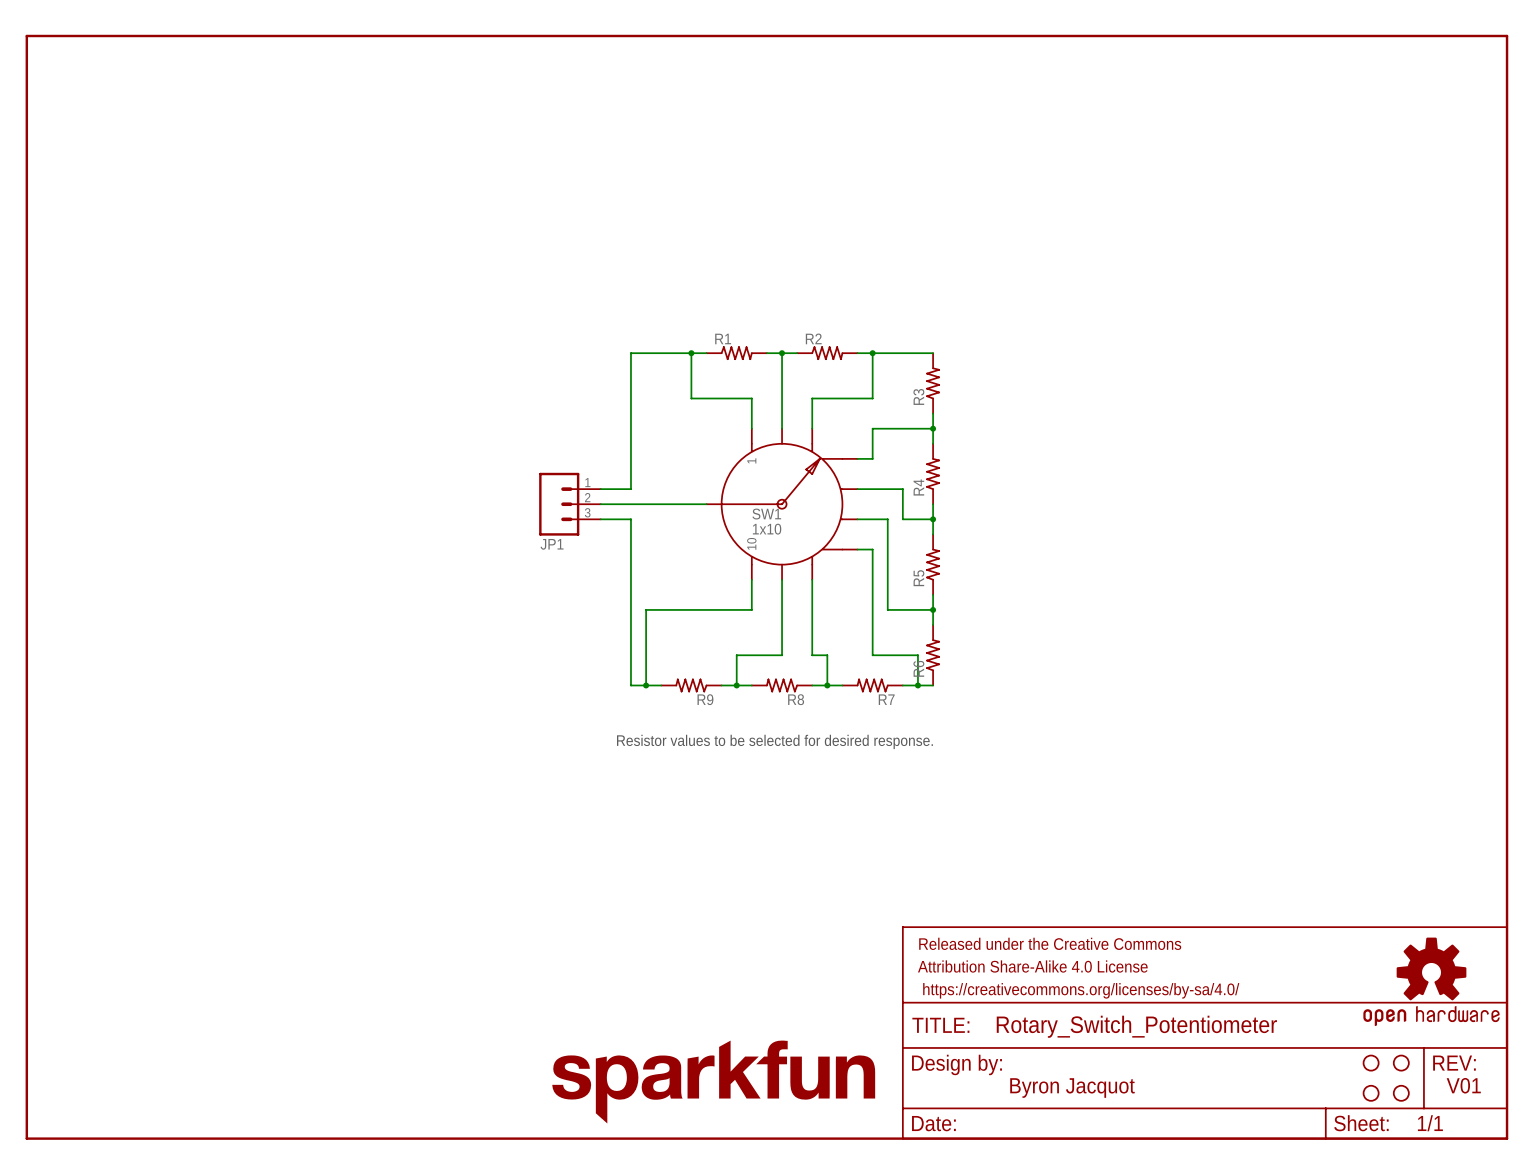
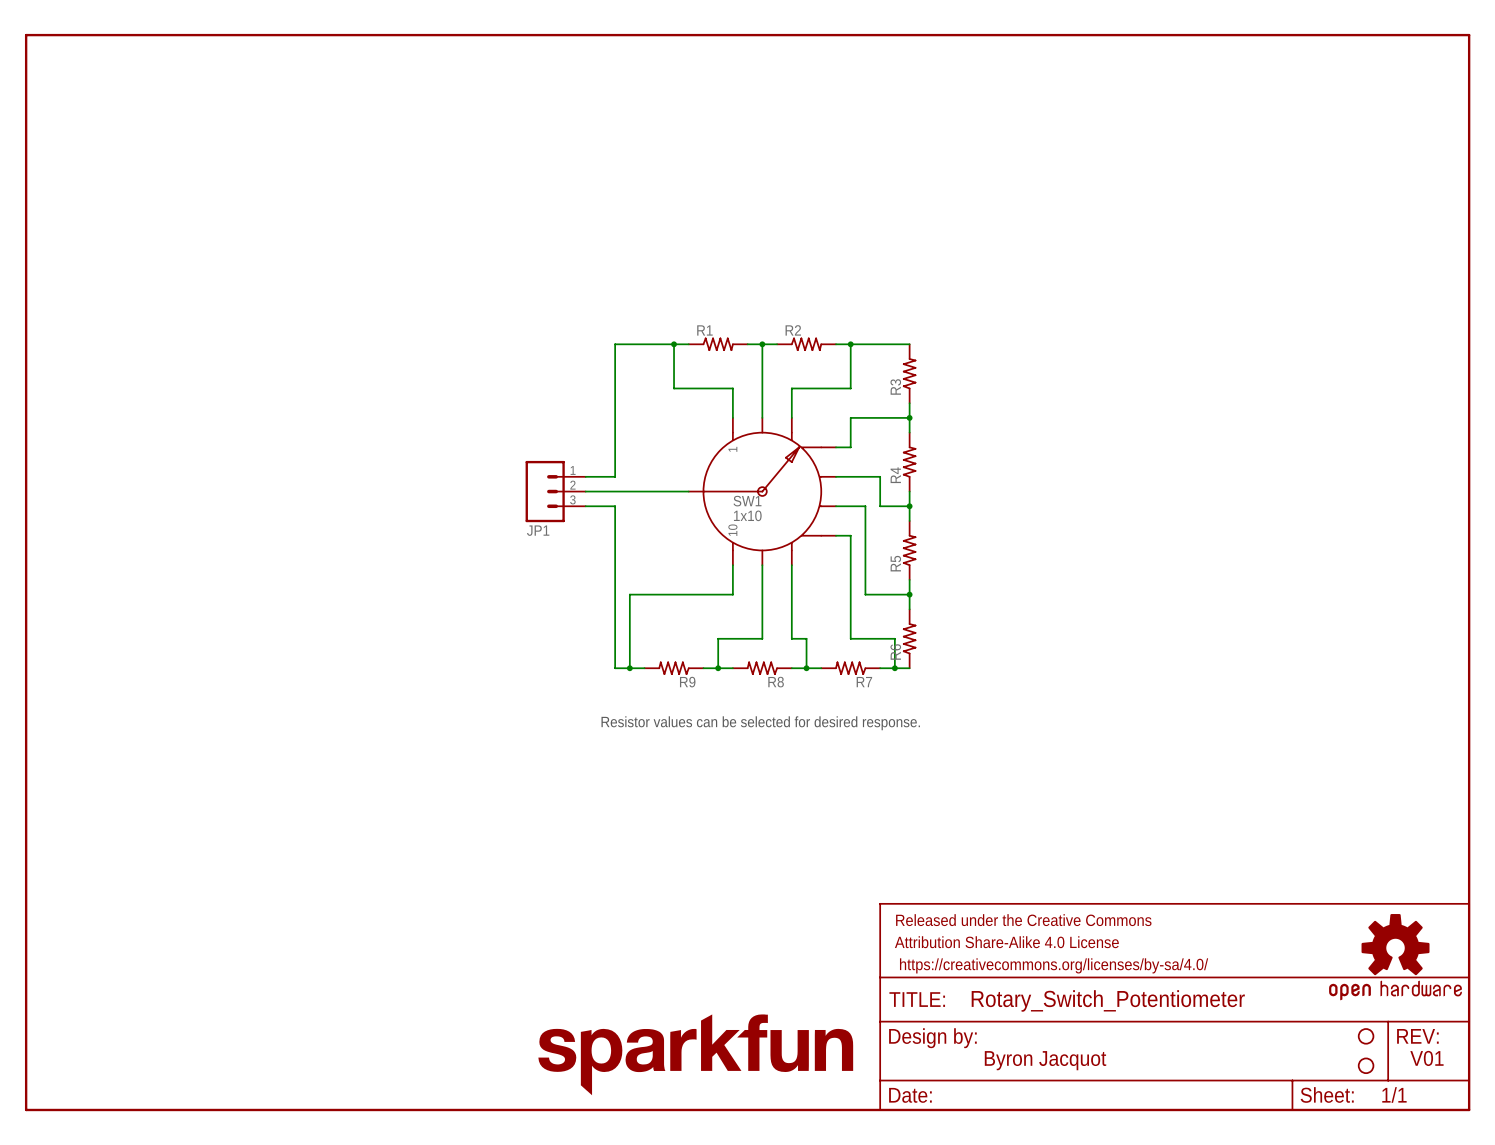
text: Resistor values to be selected for desired response. (774, 741) -> Resistor values can be selected for desired response. (760, 723)
part: (1371, 1063) -> none
part: (1371, 1093) -> none

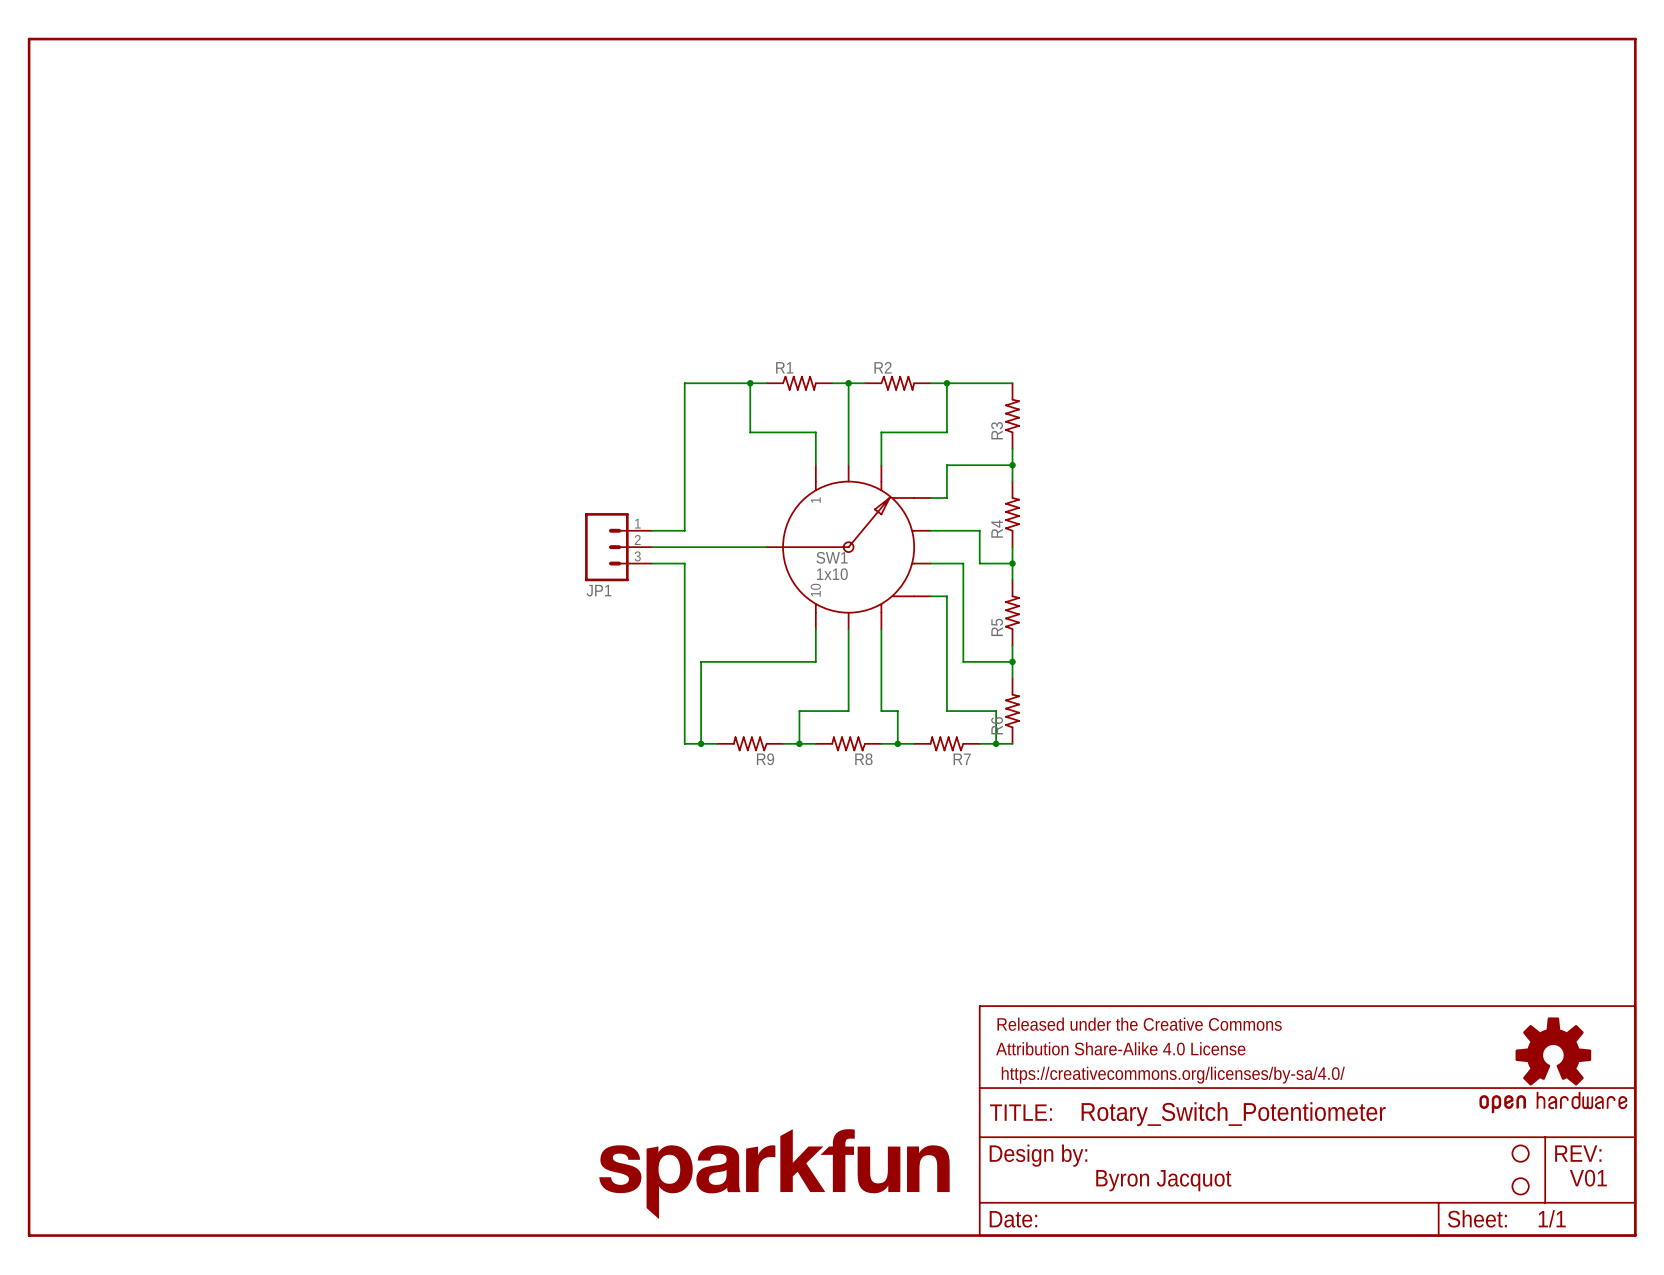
text: Resistor values can be selected for desired response. (760, 723) -> none

